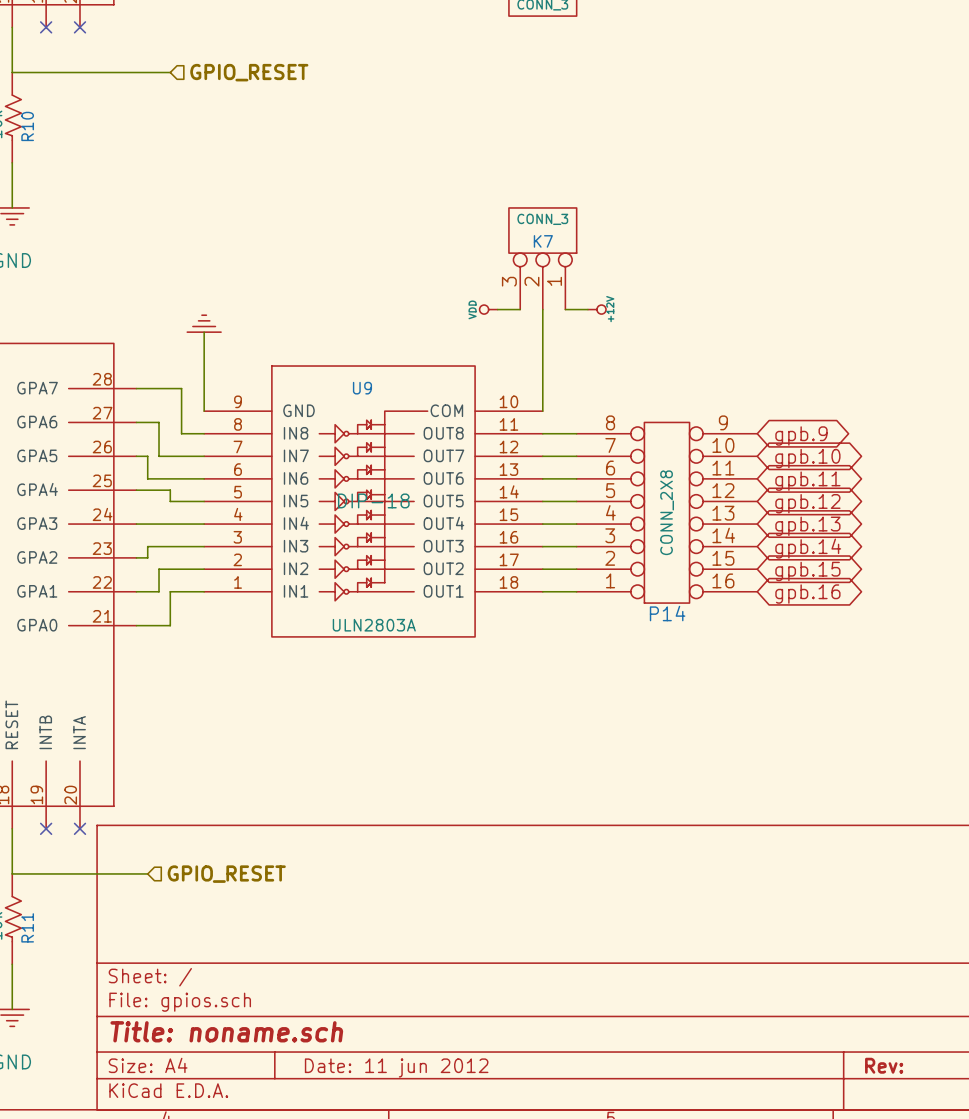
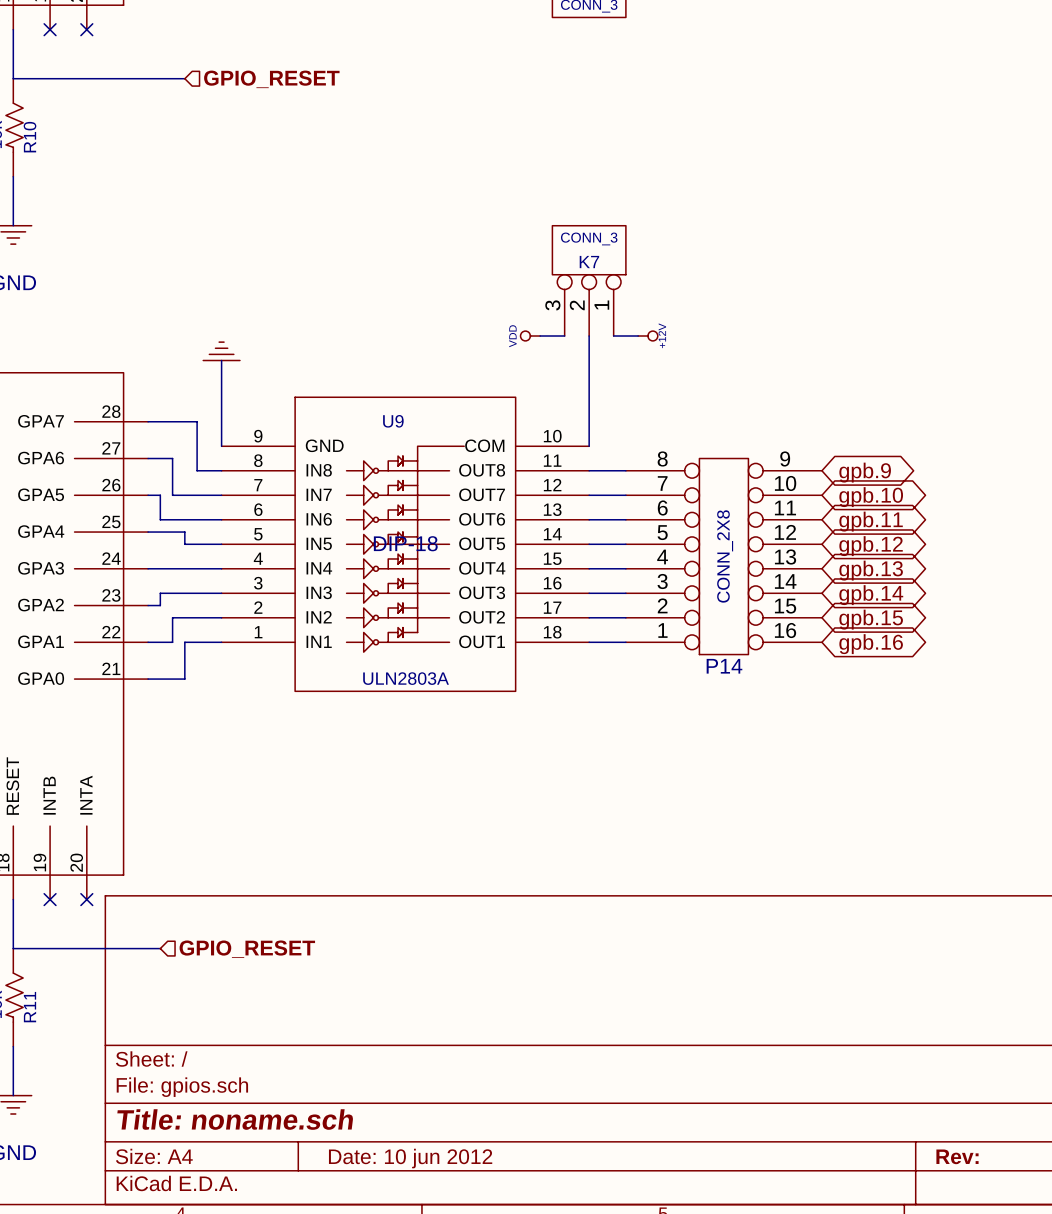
title block: Date: 11 jun 2012 (396, 1067) -> Date: 10 jun 2012 (410, 1158)

